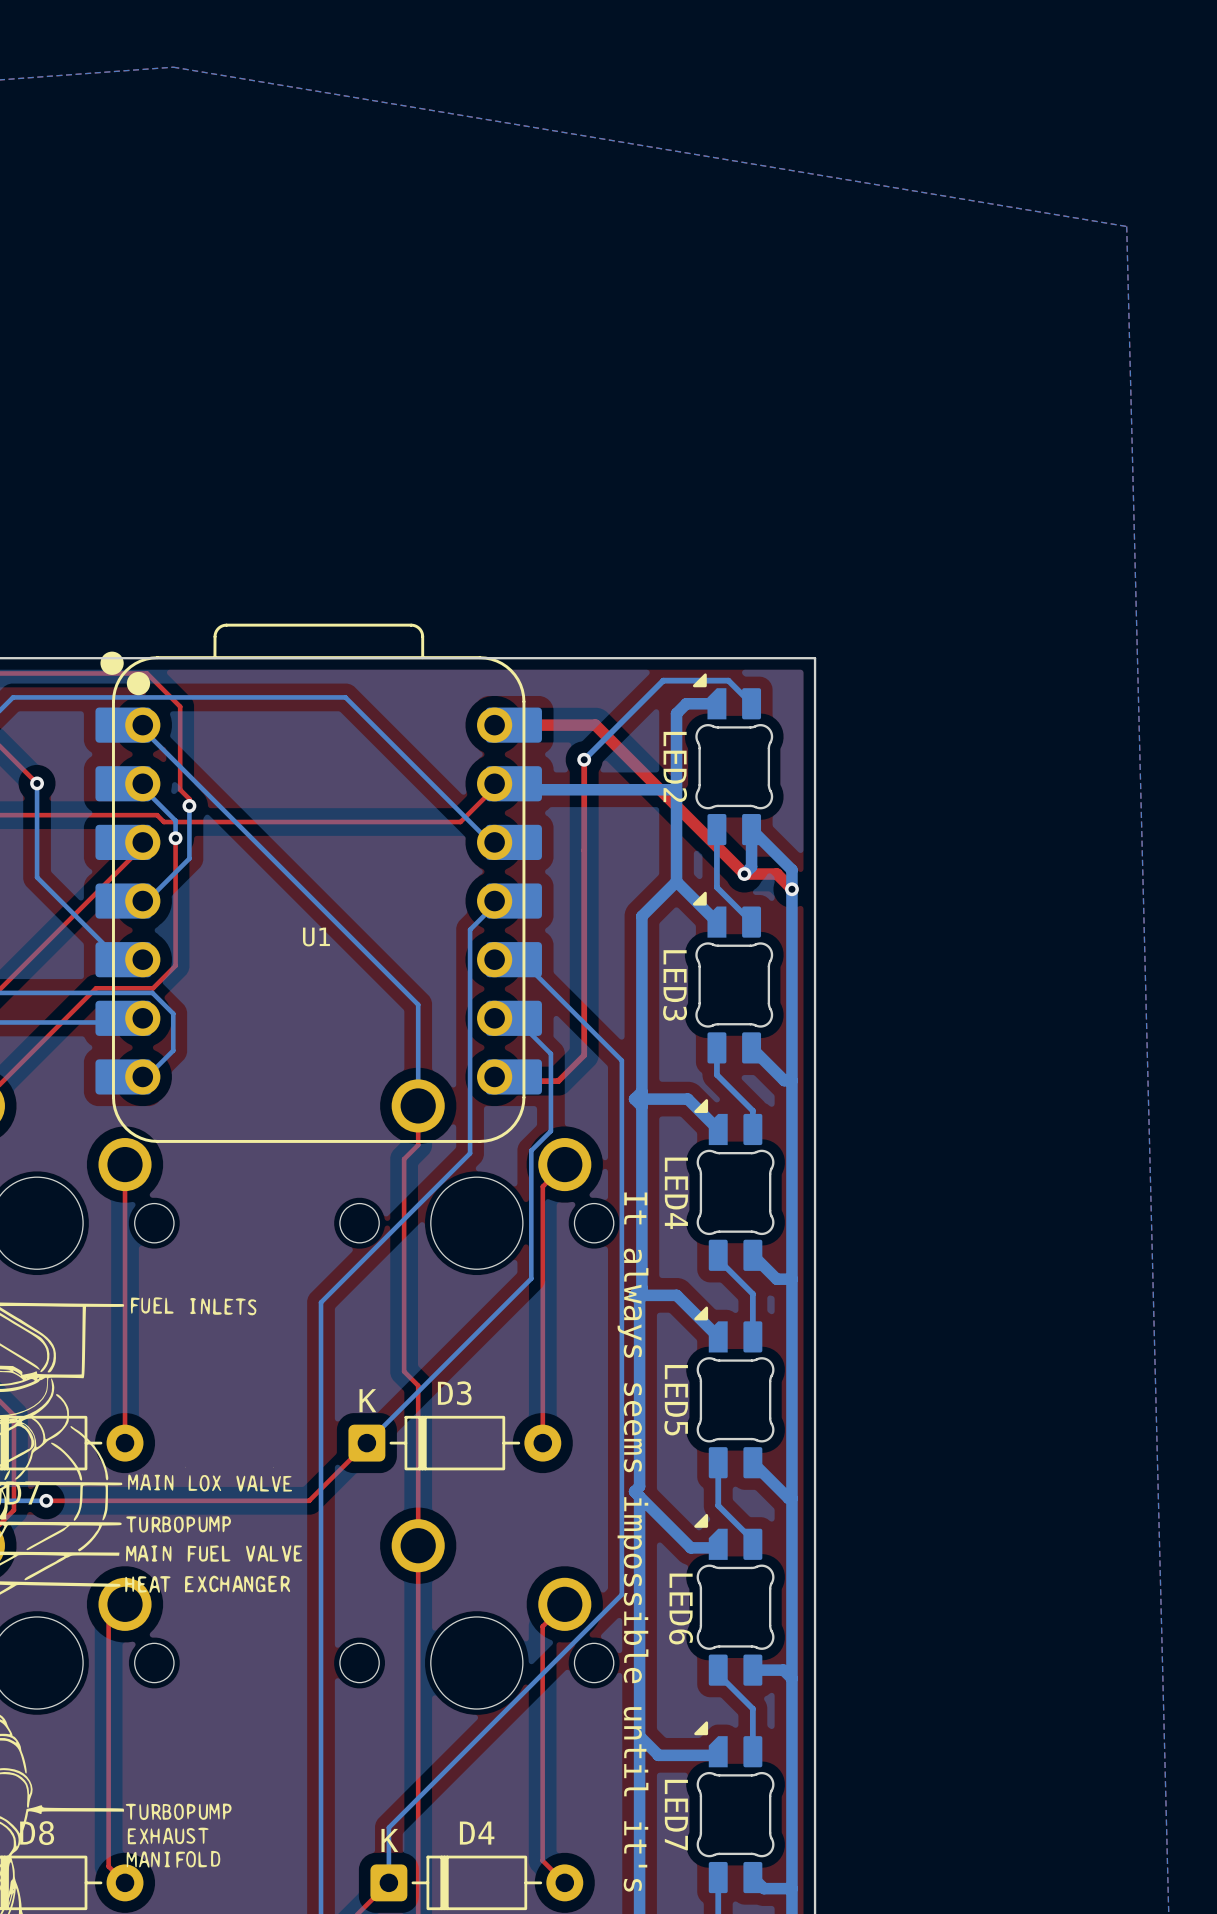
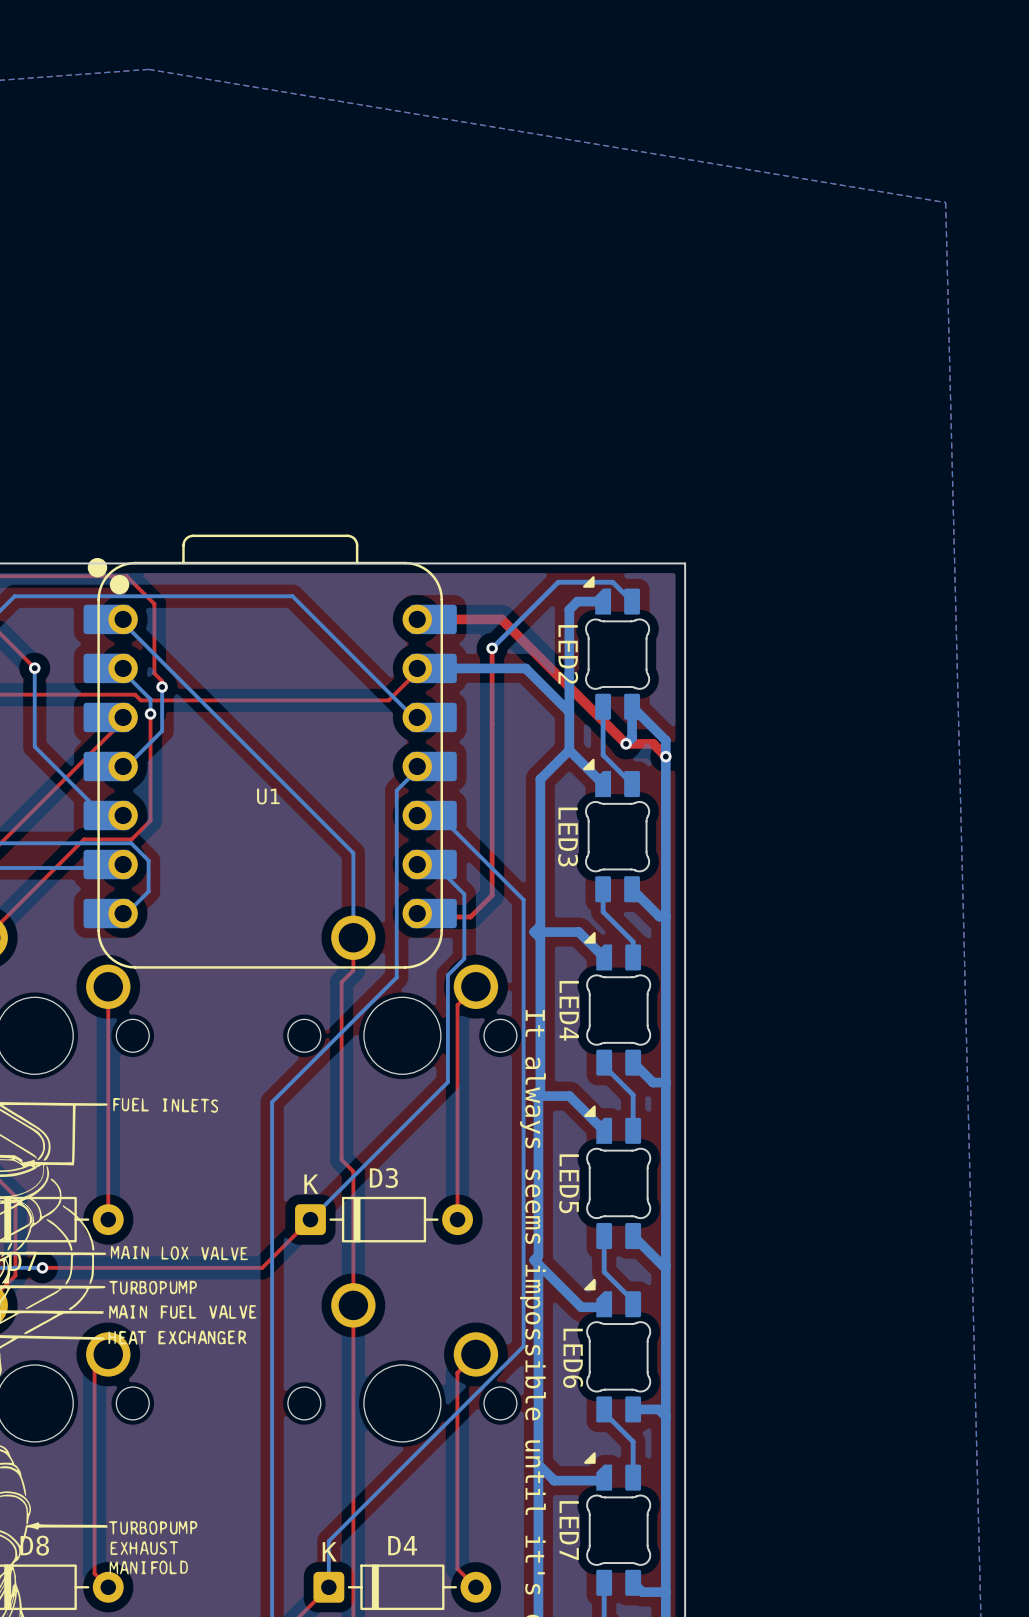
bottom track: none -> (433, 668) (525, 668) (569, 712)
bottom track: (676, 789) (521, 789) -> none

